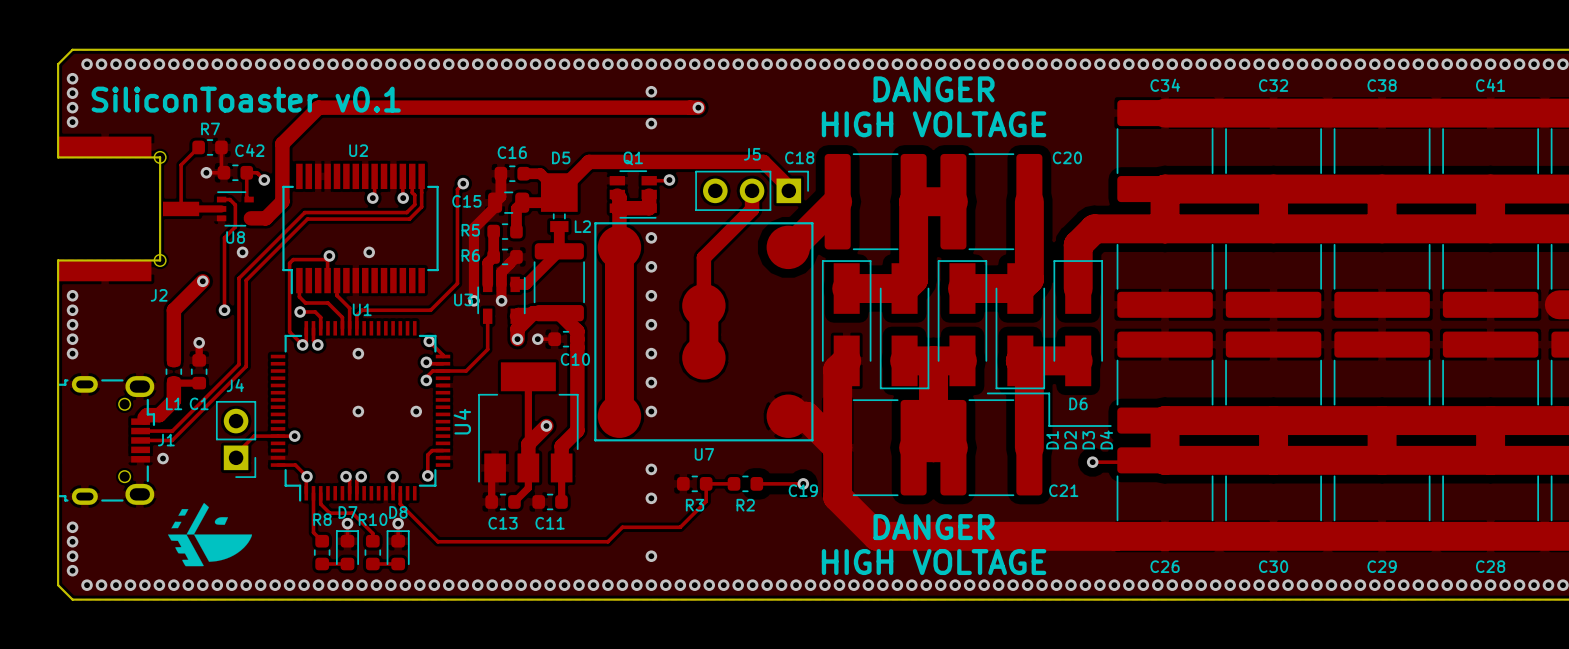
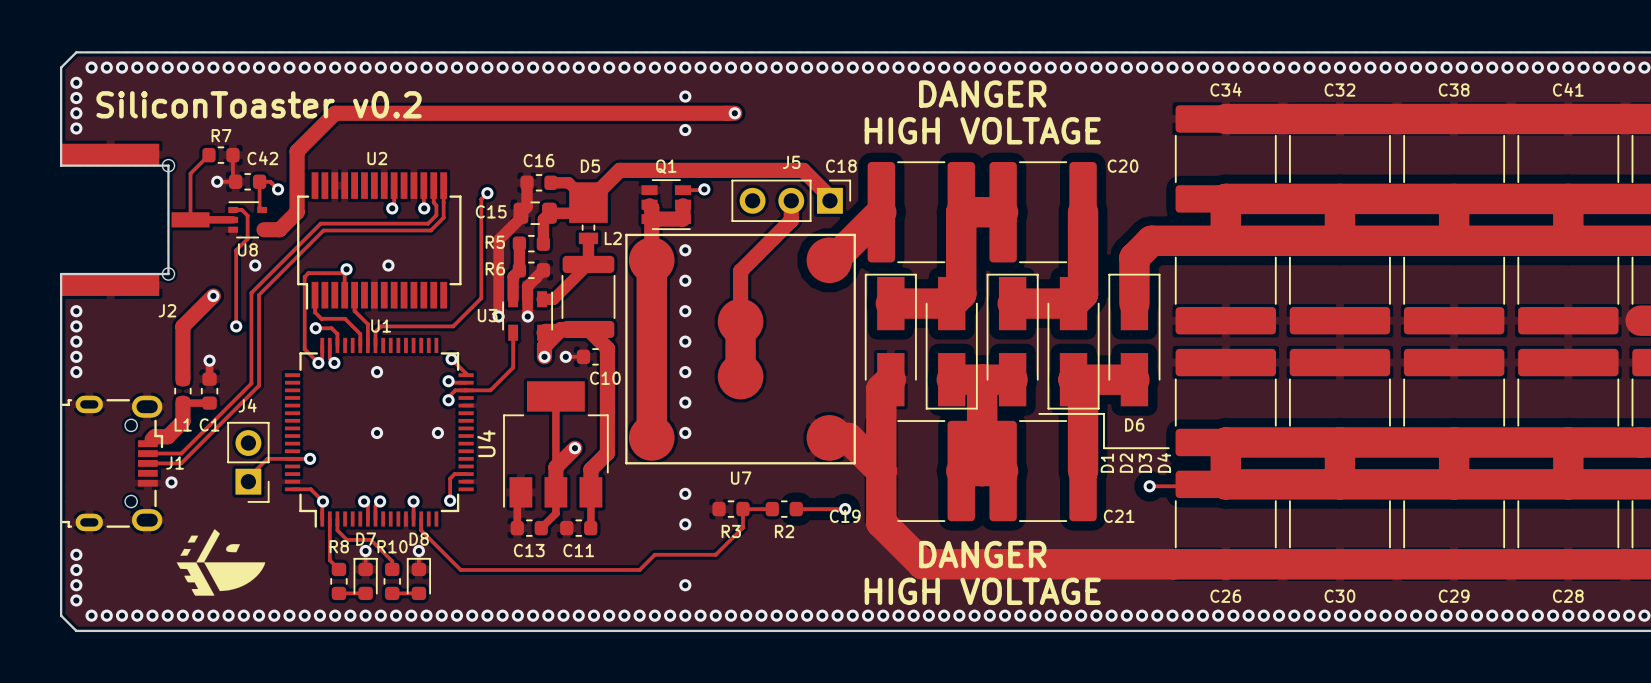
text: SiliconToaster v0.1 (246, 99) -> SiliconToaster v0.2 (259, 104)

